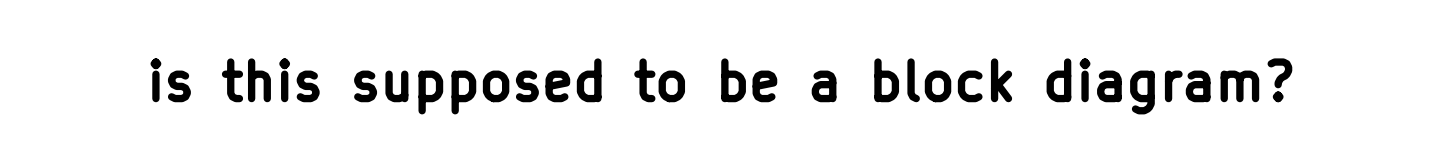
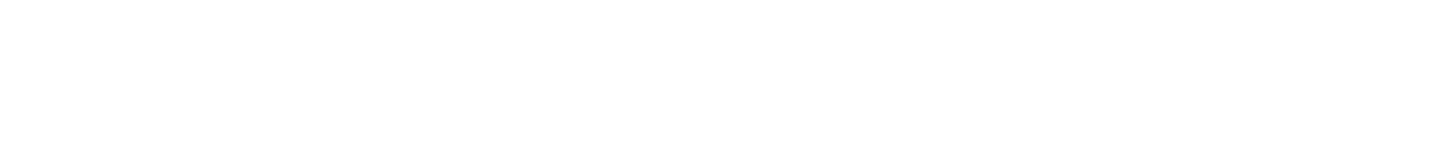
text: is this supposed to be a block diagram? (721, 86) -> none

